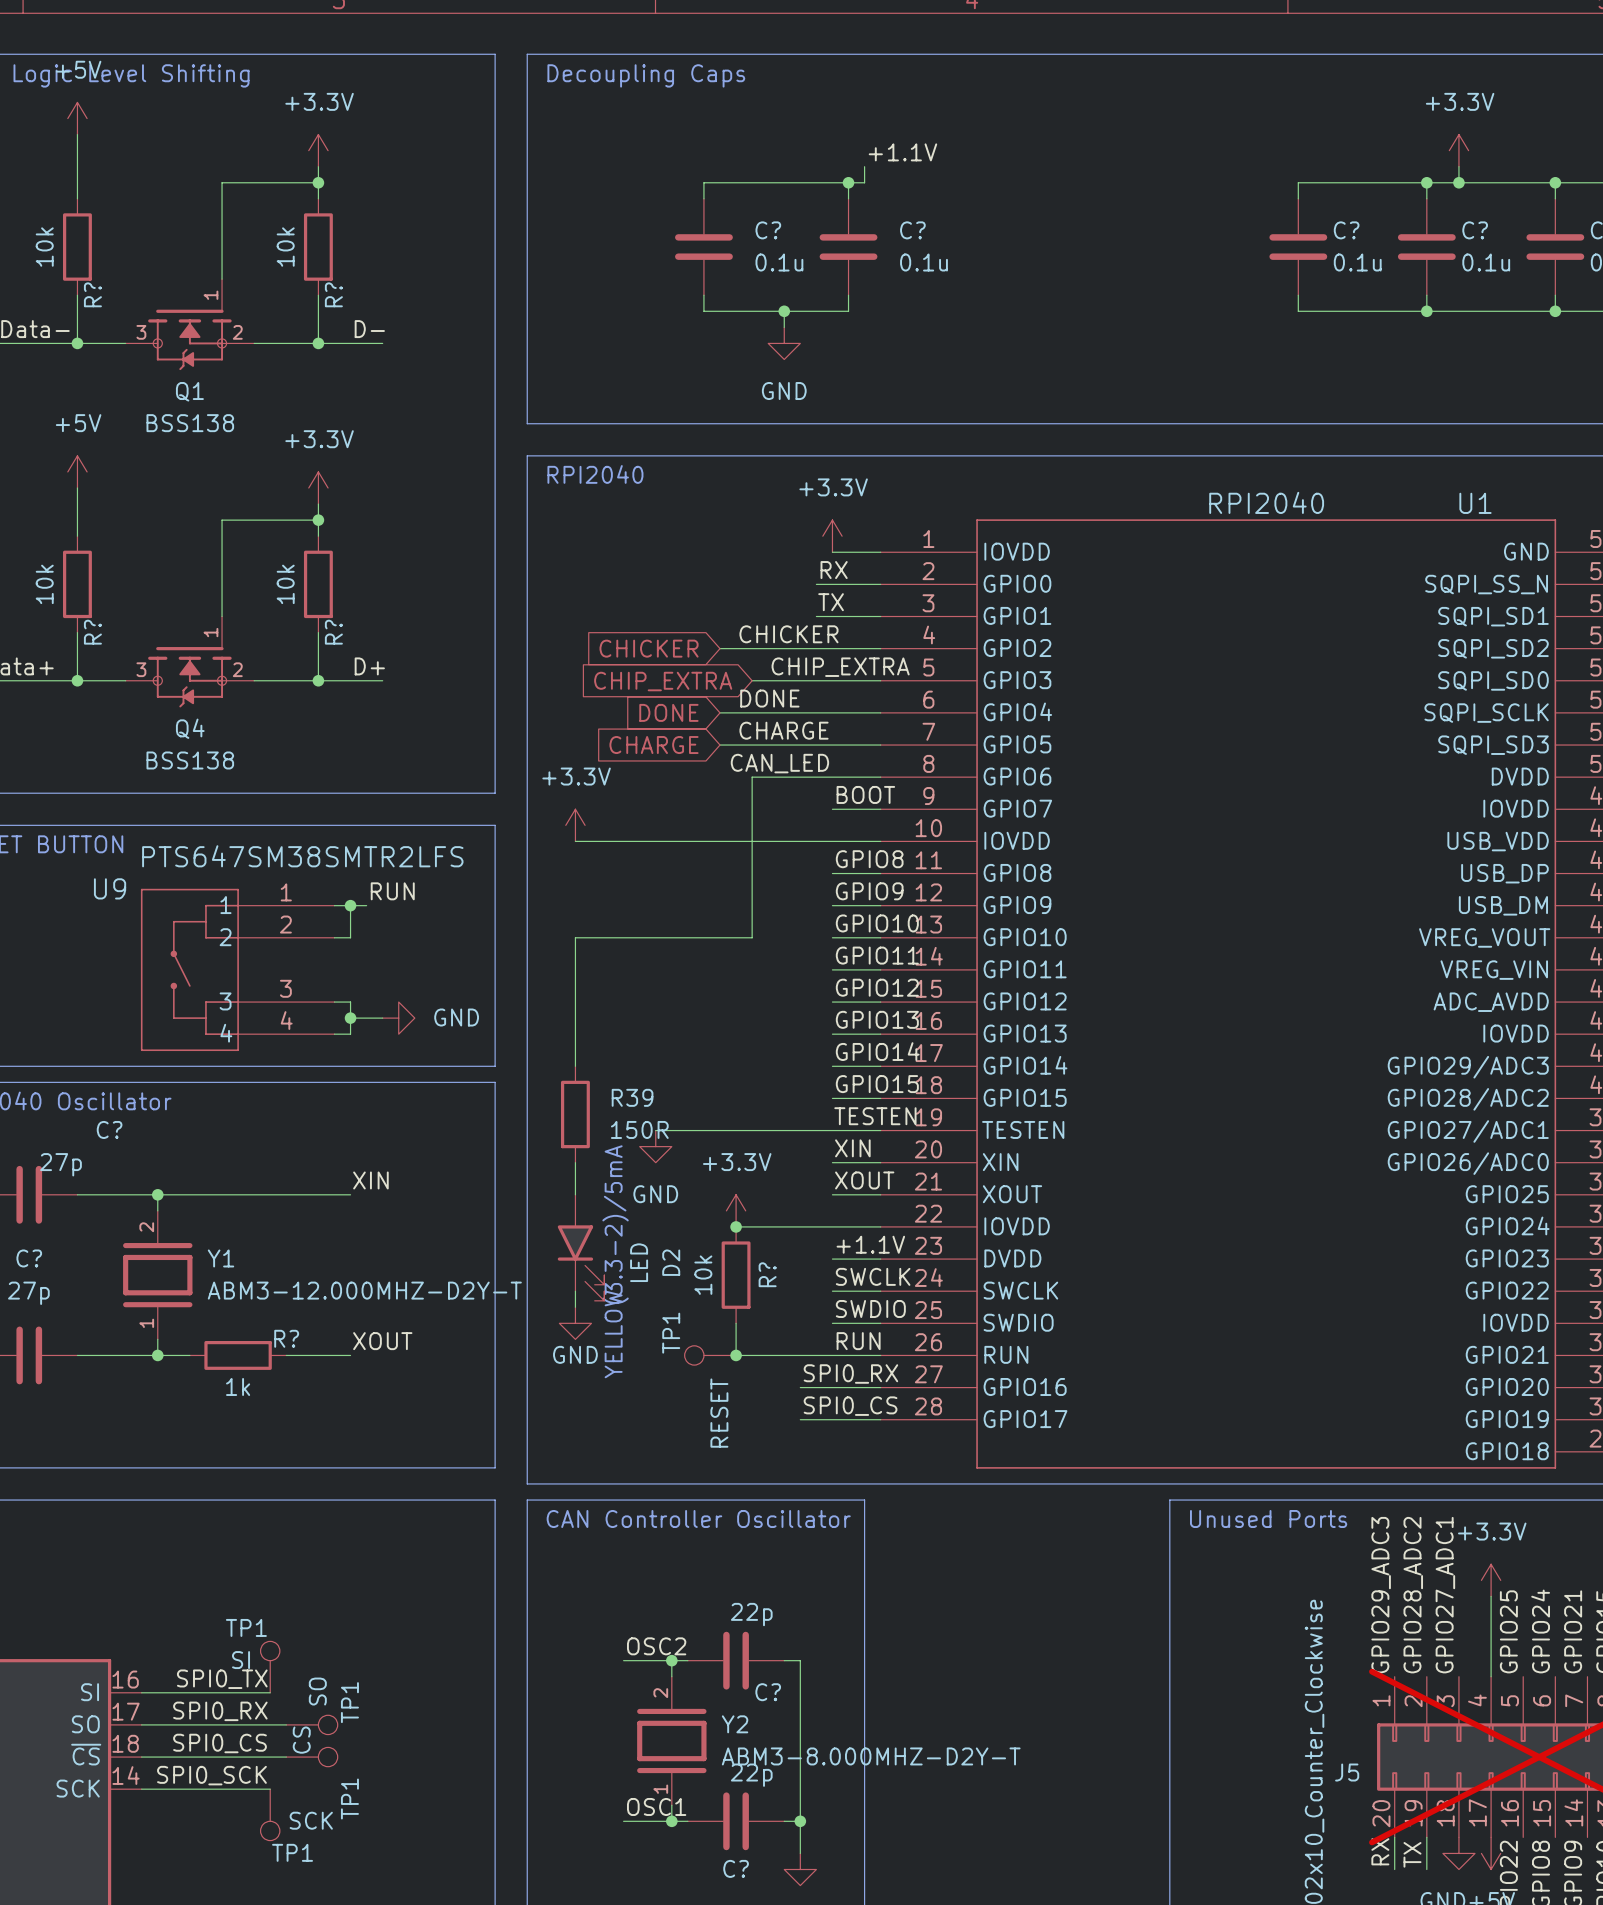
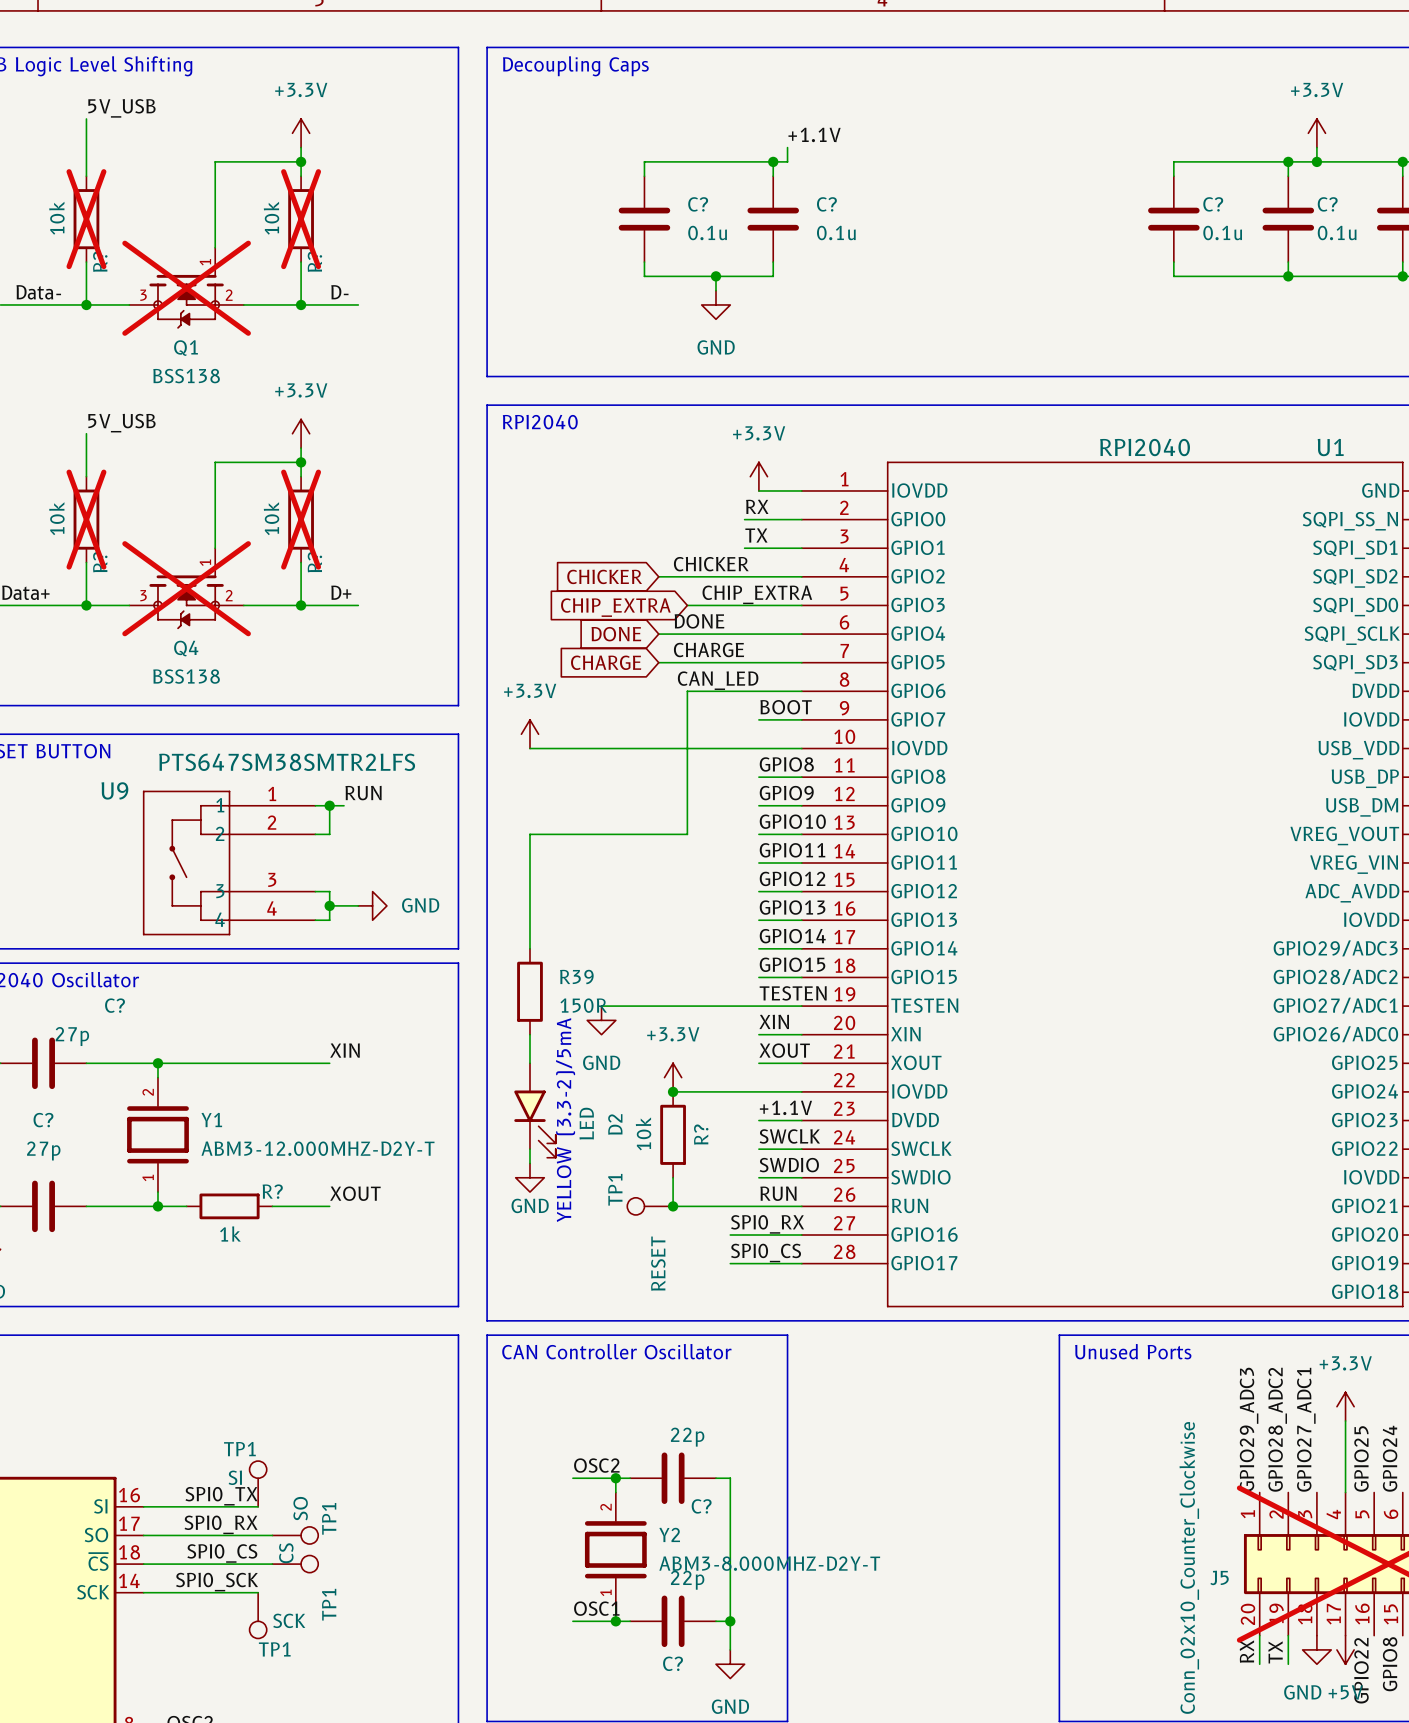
power symbol: +5V (77, 118) -> none
label: none -> 5V_USB (121, 108)
R? do-not-place cross: none -> (86, 219)
R? do-not-place cross: none -> (301, 219)
Q1 do-not-place cross: none -> (186, 288)
power symbol: +5V (77, 471) -> none
label: none -> 5V_USB (121, 423)
R? do-not-place cross: none -> (86, 519)
R? do-not-place cross: none -> (301, 519)
Q4 do-not-place cross: none -> (186, 588)

